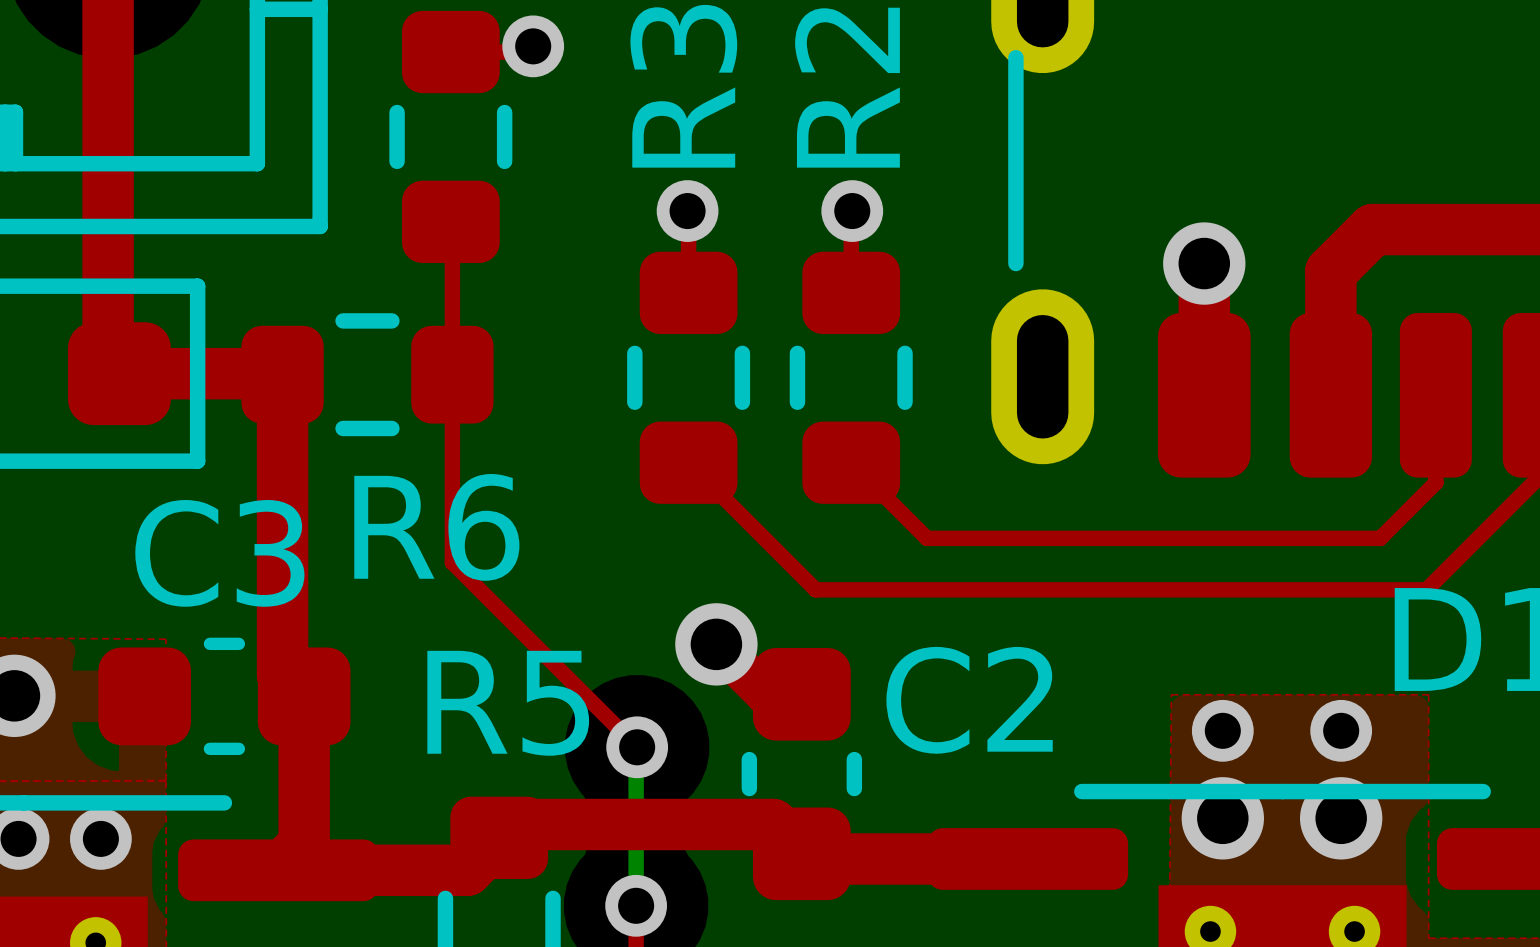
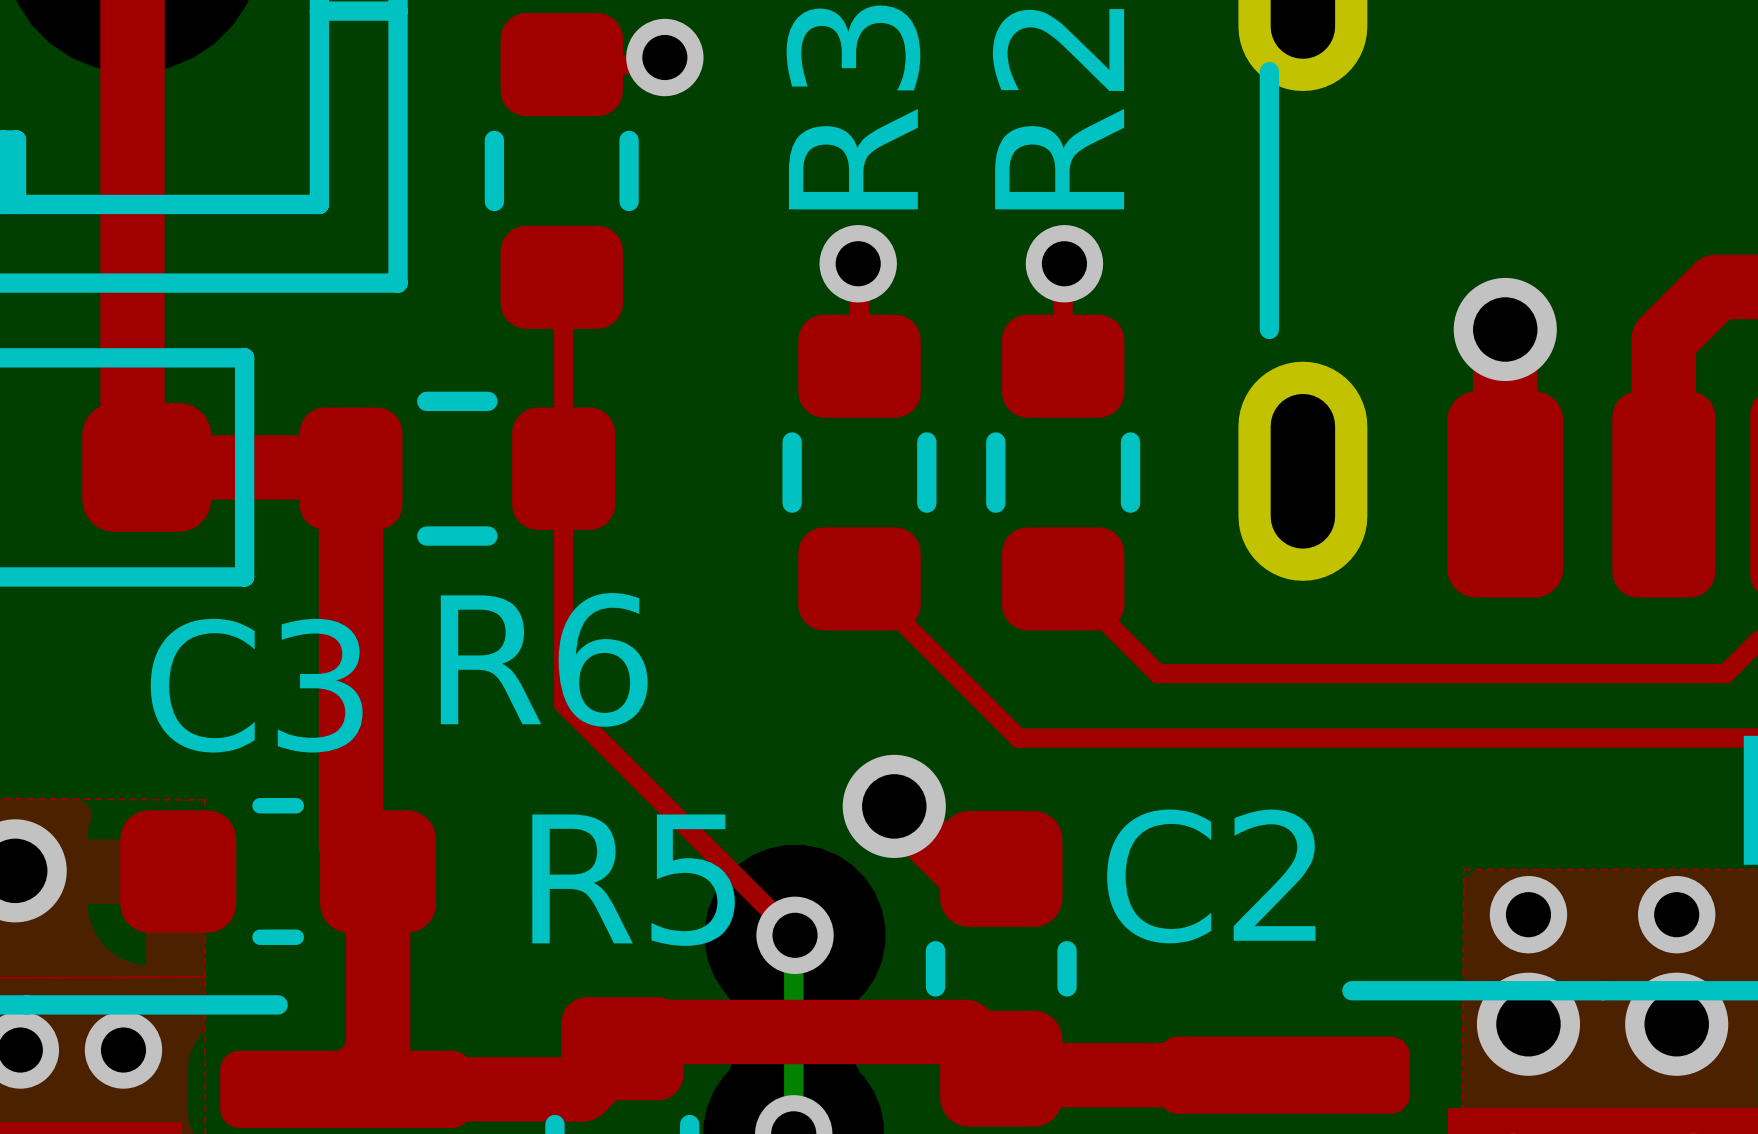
C3 name position: C3 (219, 553) -> C3 (256, 685)

